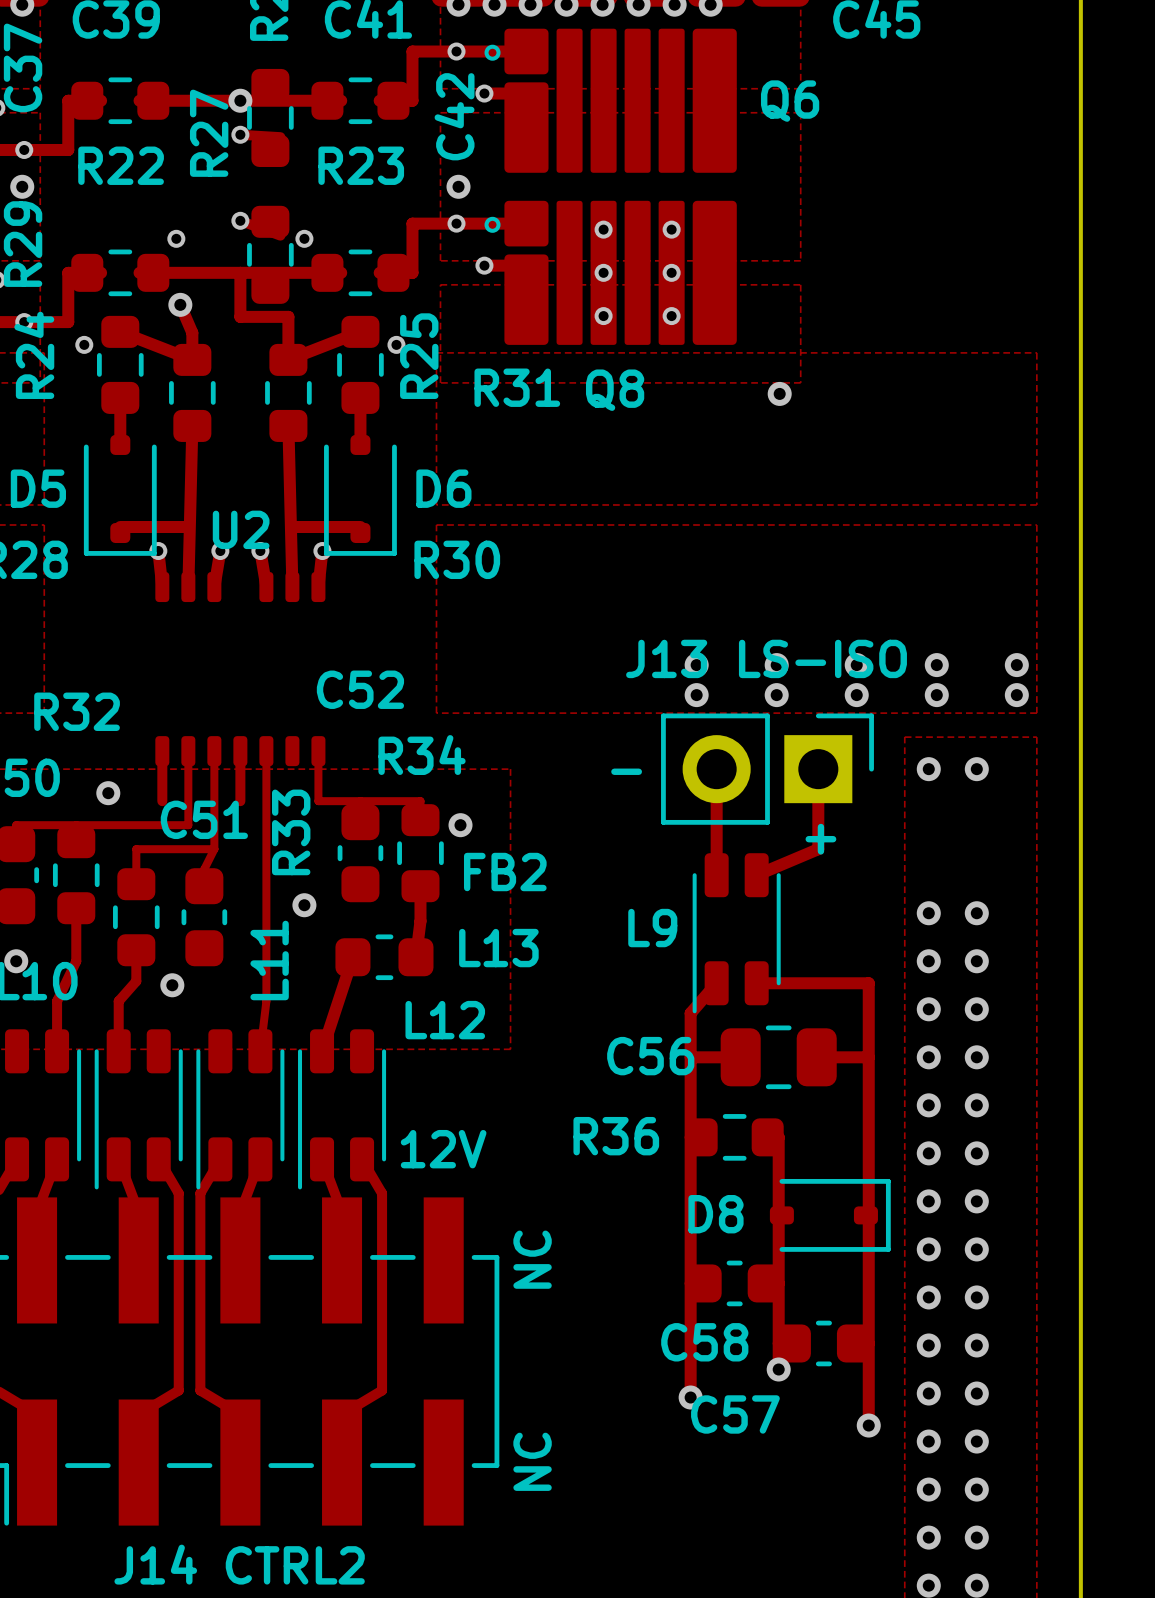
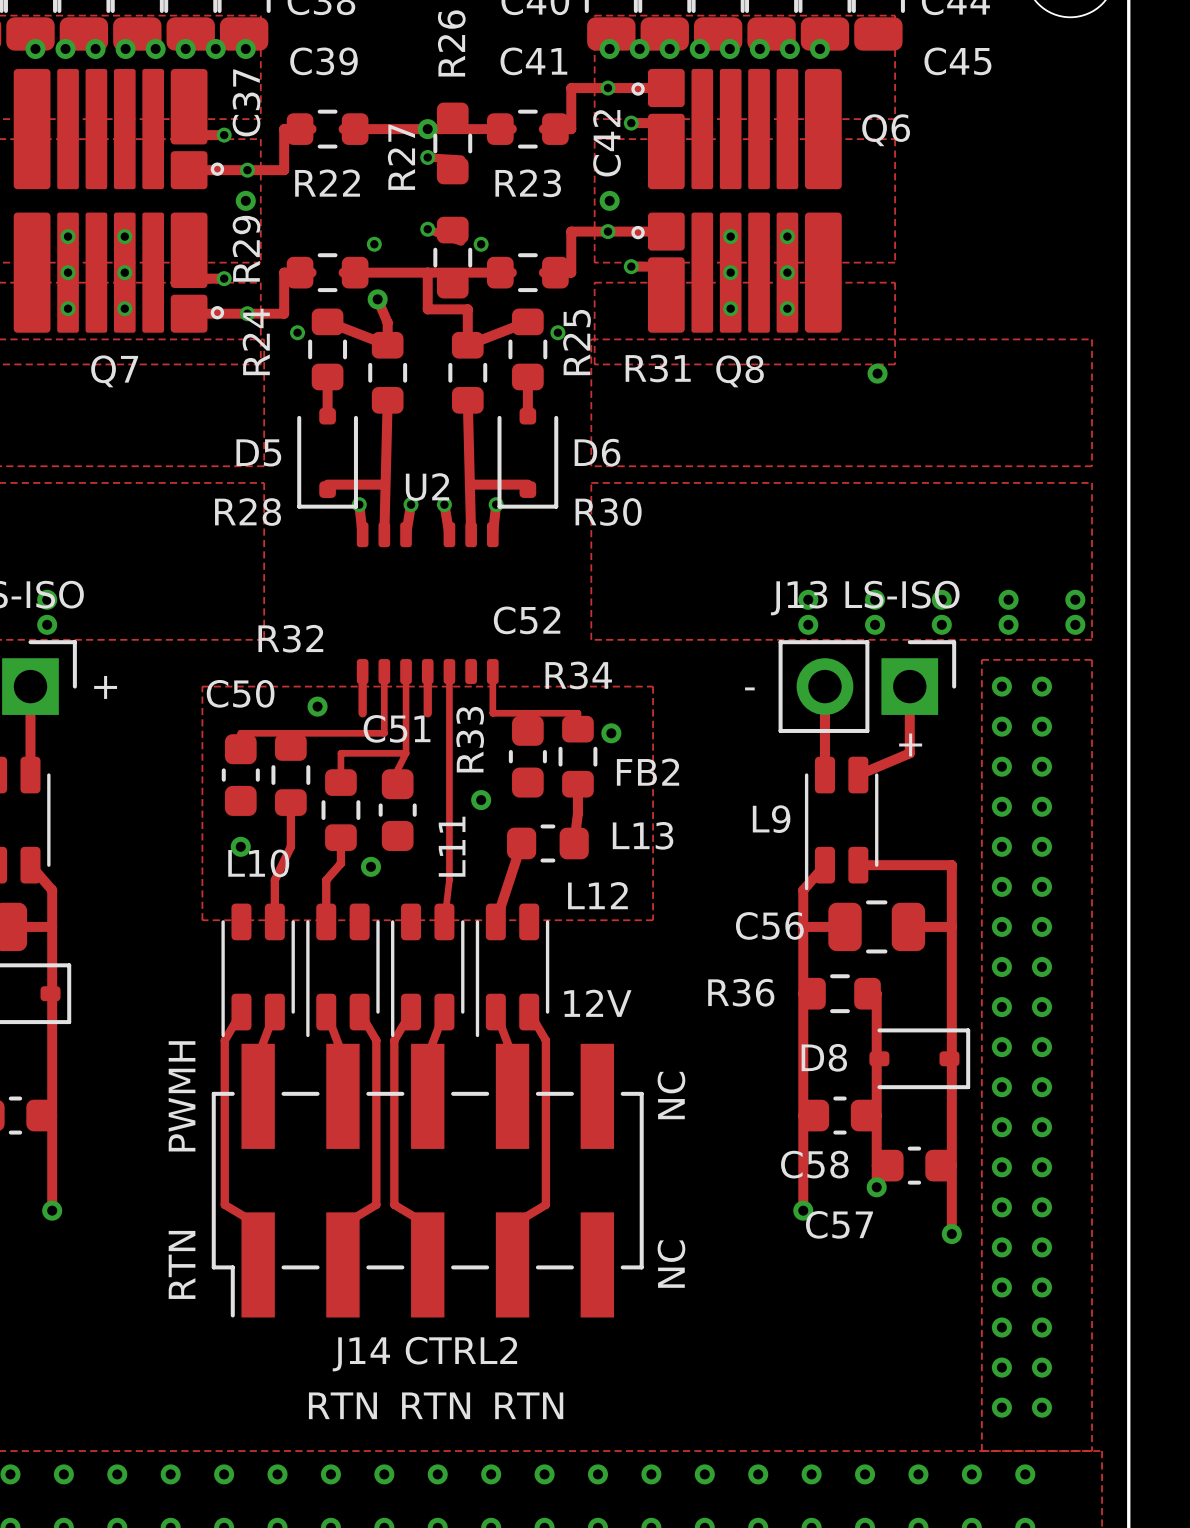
via: none -> (1001, 726)
via: none -> (1041, 726)
via: none -> (1001, 766)
via: none -> (1041, 766)

